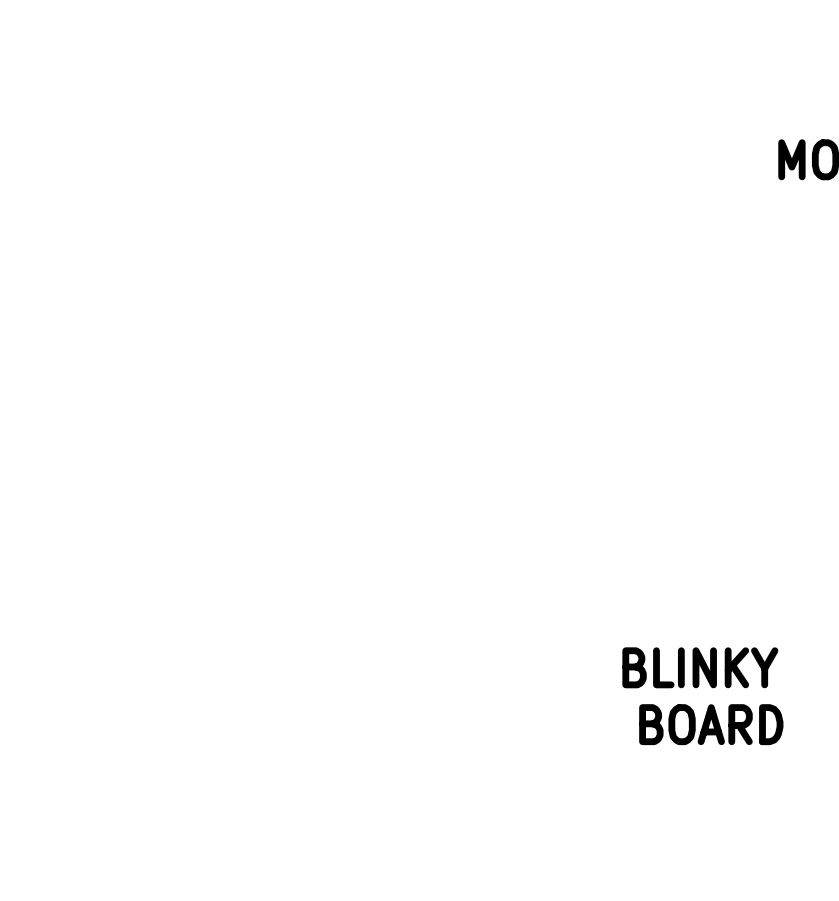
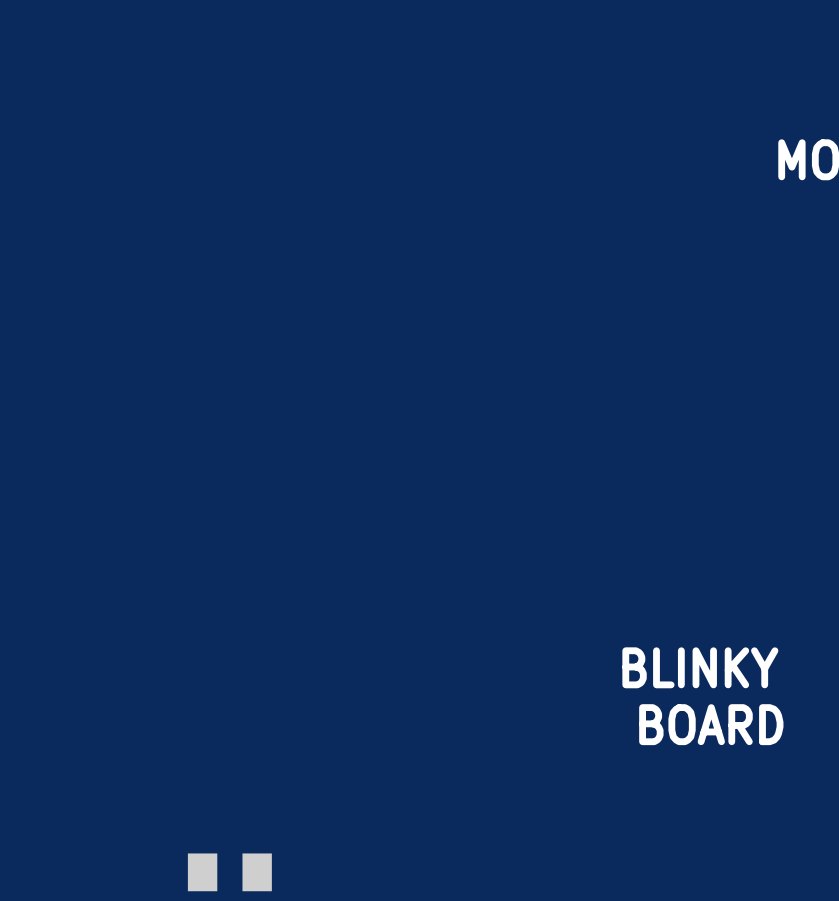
part: none -> (229, 872)

